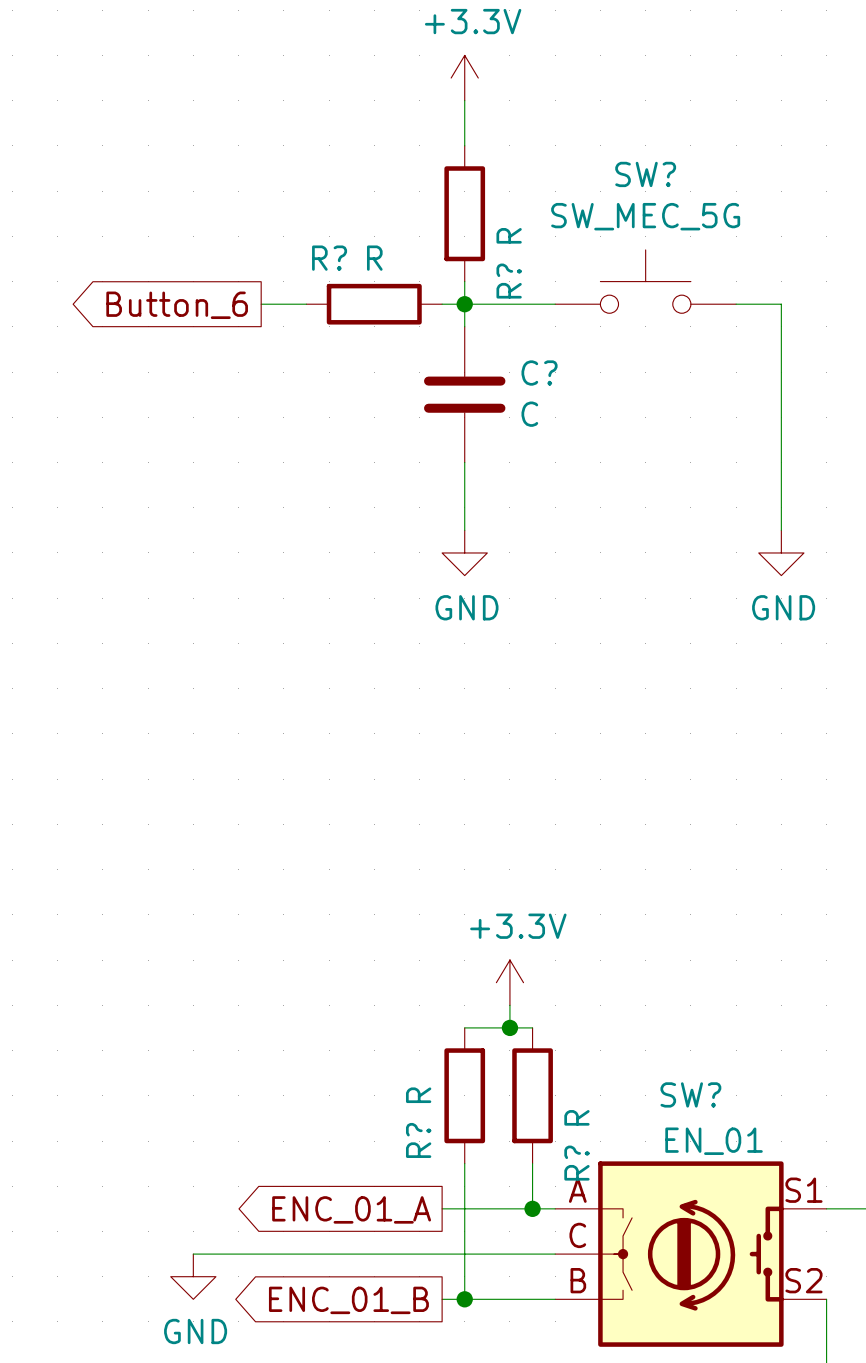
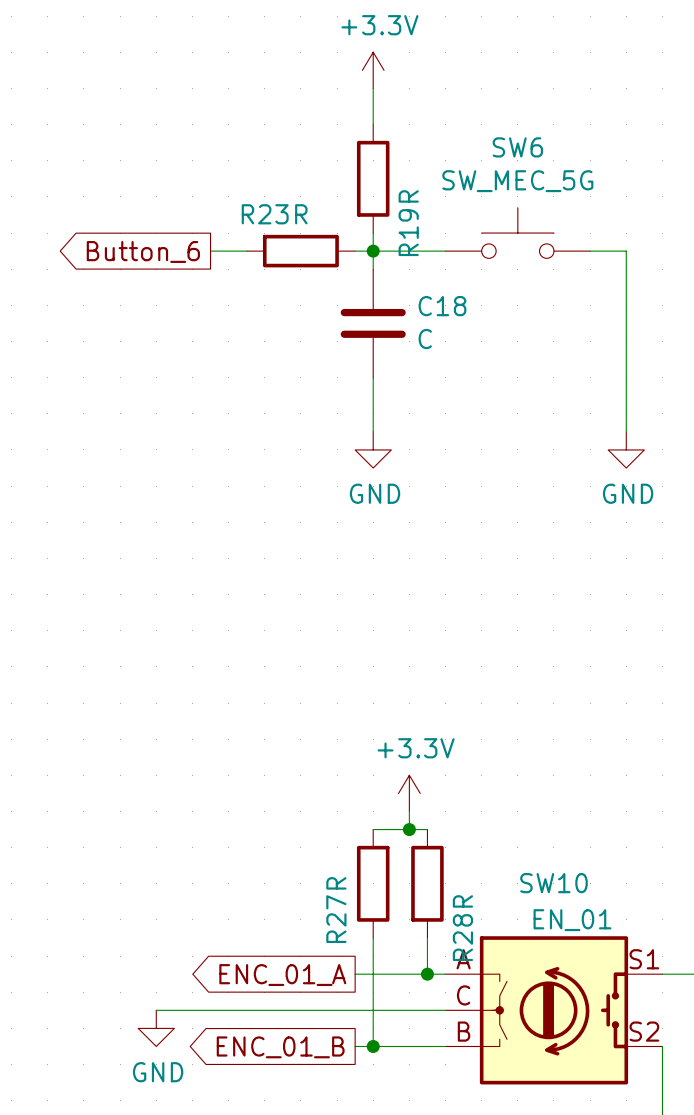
SW? name: SW? (645, 174) -> SW6 (517, 147)
R? name: R? (329, 258) -> R23 (265, 214)
R? name: R? (509, 281) -> R19 (408, 232)
C? name: C? (539, 373) -> C18 (442, 306)
SW? name: SW? (690, 1094) -> SW10 (553, 883)
R? name: R? (418, 1140) -> R27 (336, 919)
R? name: R? (576, 1163) -> R28 (462, 937)

